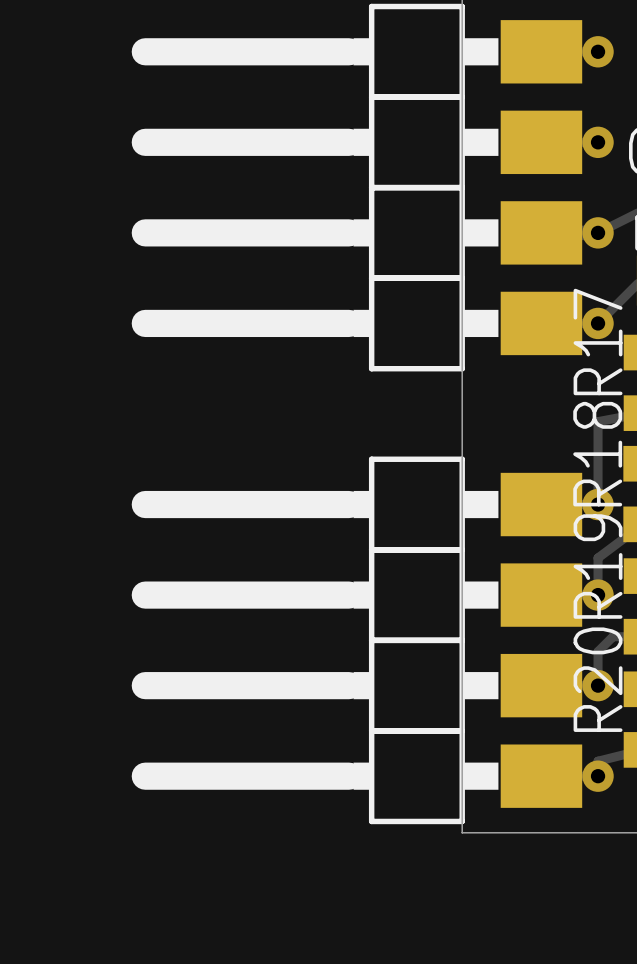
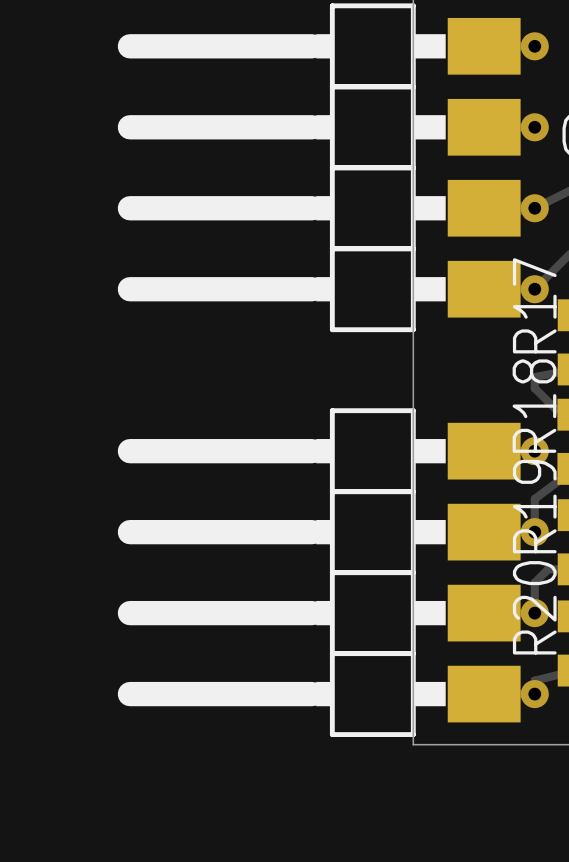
track: (598, 434) (598, 504) -> (534, 388) (556, 409)

